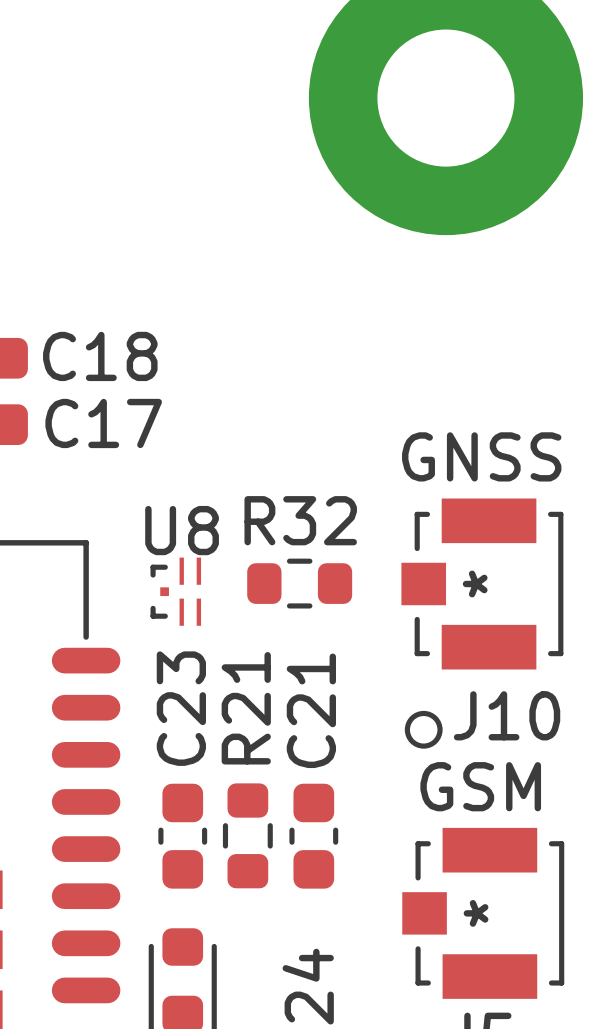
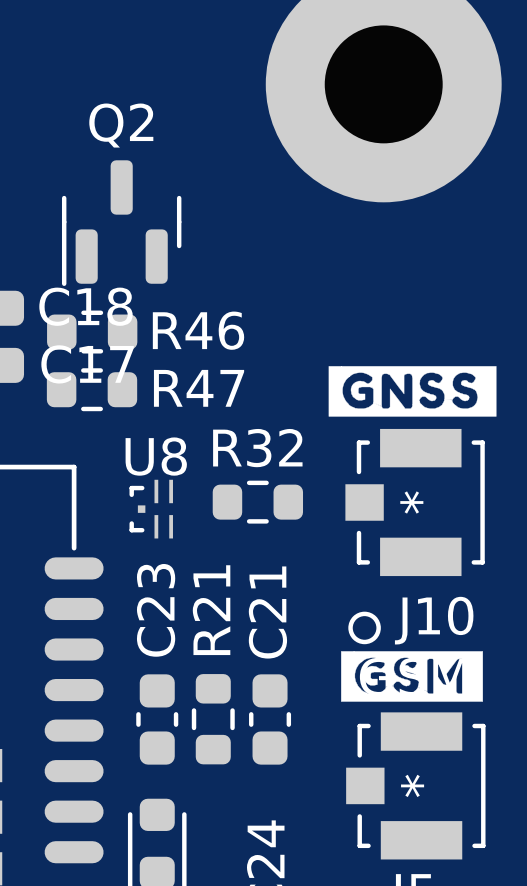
Q2: none -> (121, 223)
R46: none -> (92, 332)
drawing: none -> [328, 366, 497, 417]
R47: none -> (92, 389)
J10 value: GNSS (481, 456) -> none
drawing: none -> [341, 651, 483, 702]

